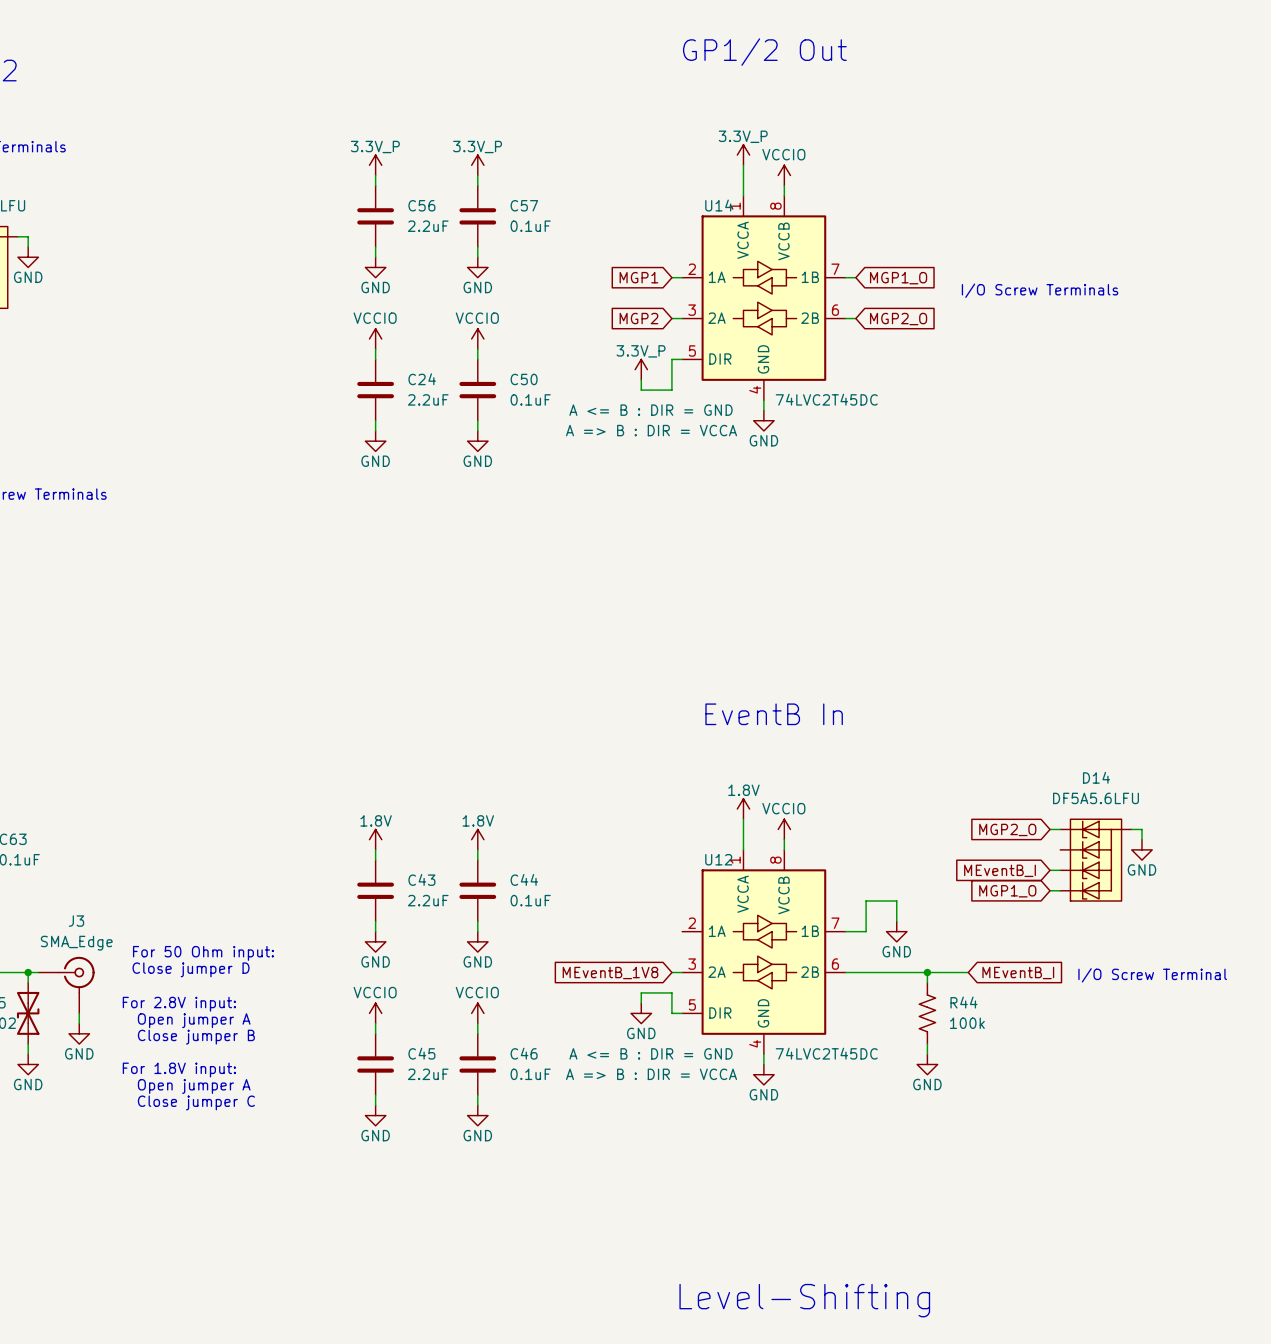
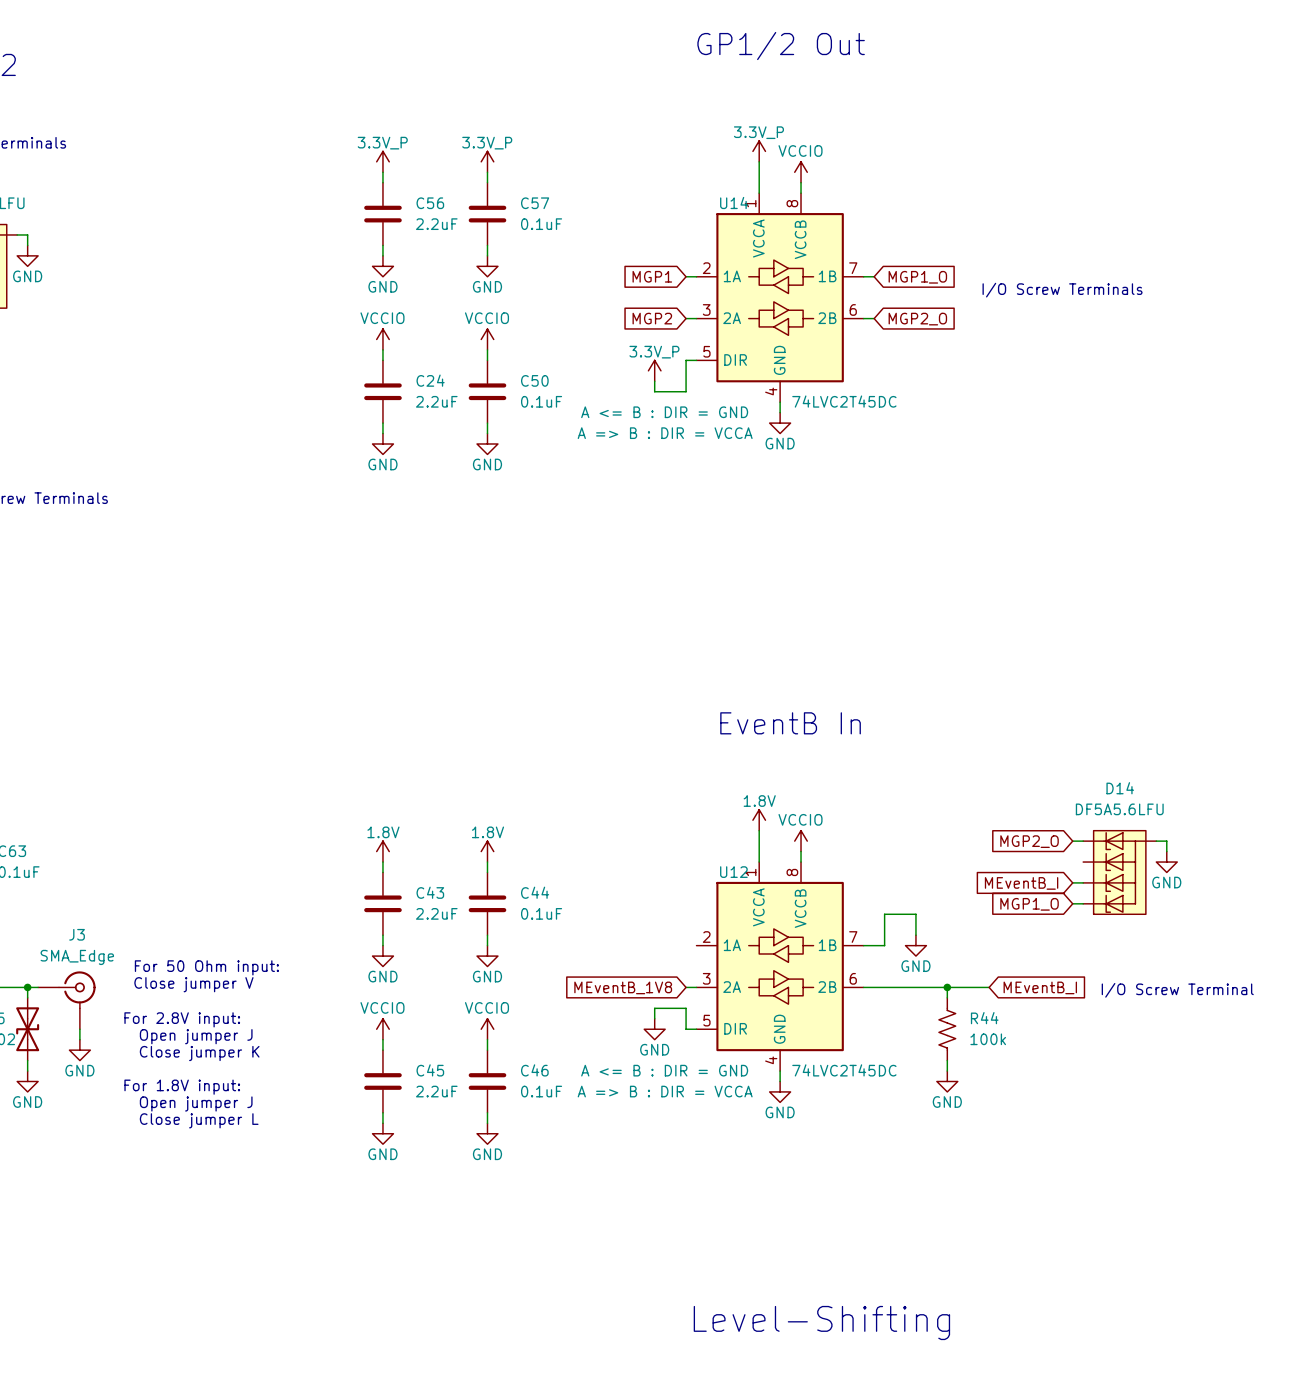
text: Close jumper D (191, 969) -> Close jumper V (193, 984)
text: Open jumper A (194, 1020) -> Open jumper J (196, 1036)
text: Close jumper B (196, 1037) -> Close jumper K (199, 1053)
text: Open jumper A (194, 1086) -> Open jumper J (196, 1103)
text: Close jumper C (196, 1102) -> Close jumper L (199, 1120)

